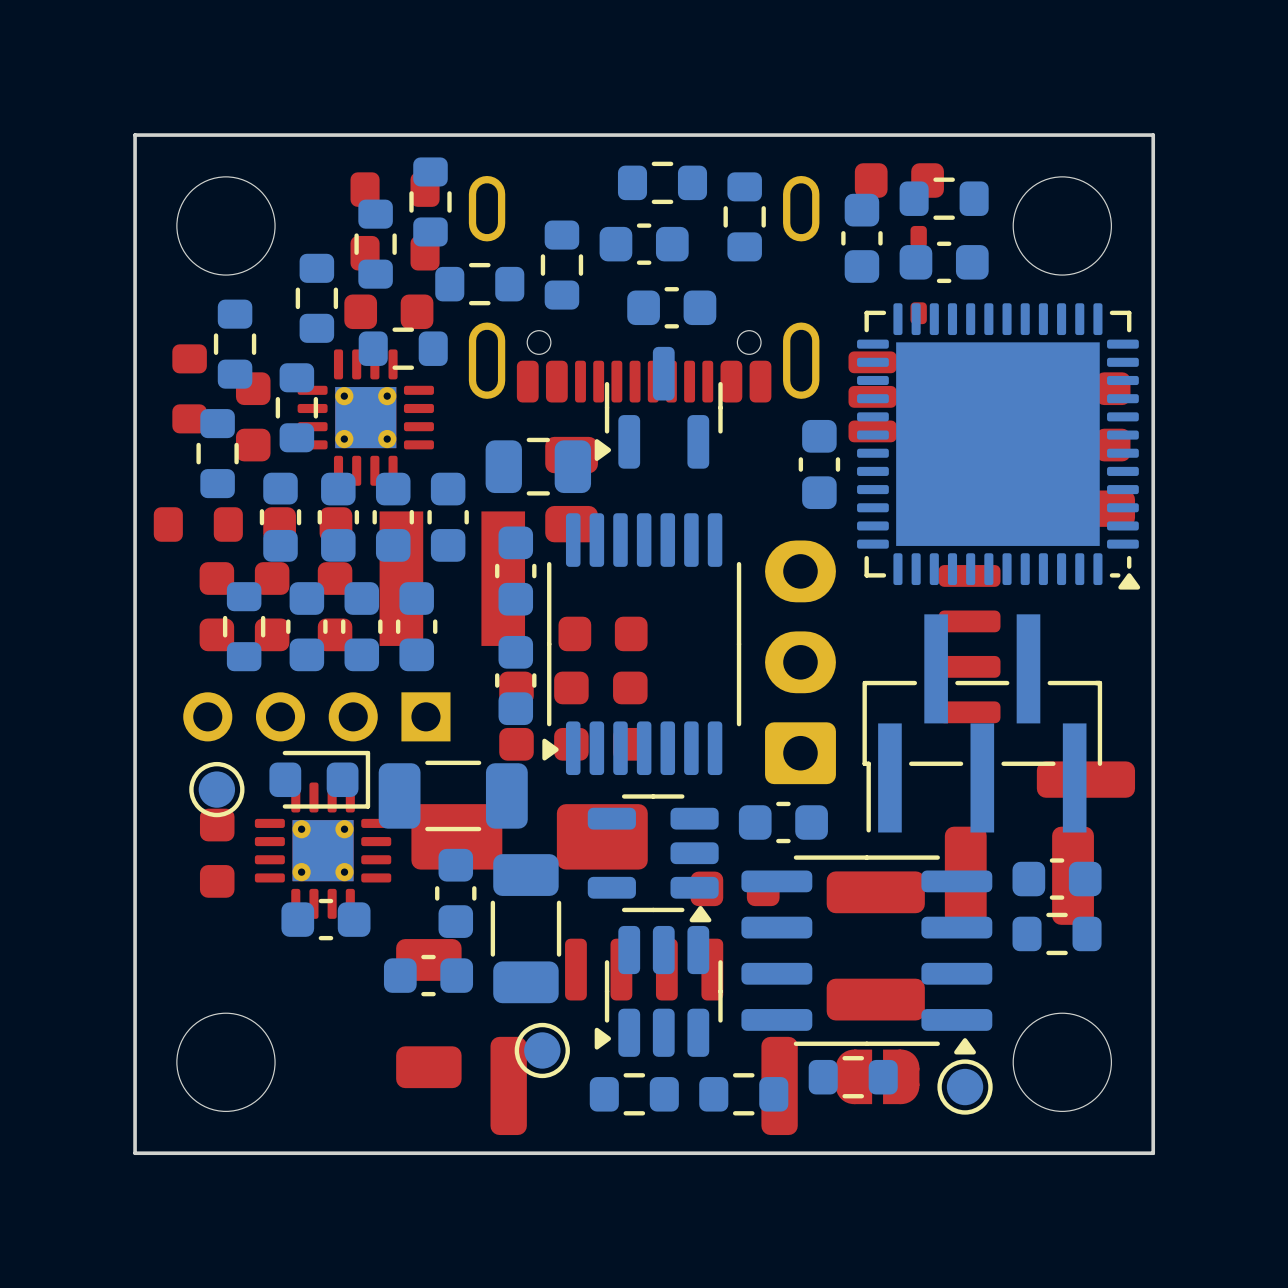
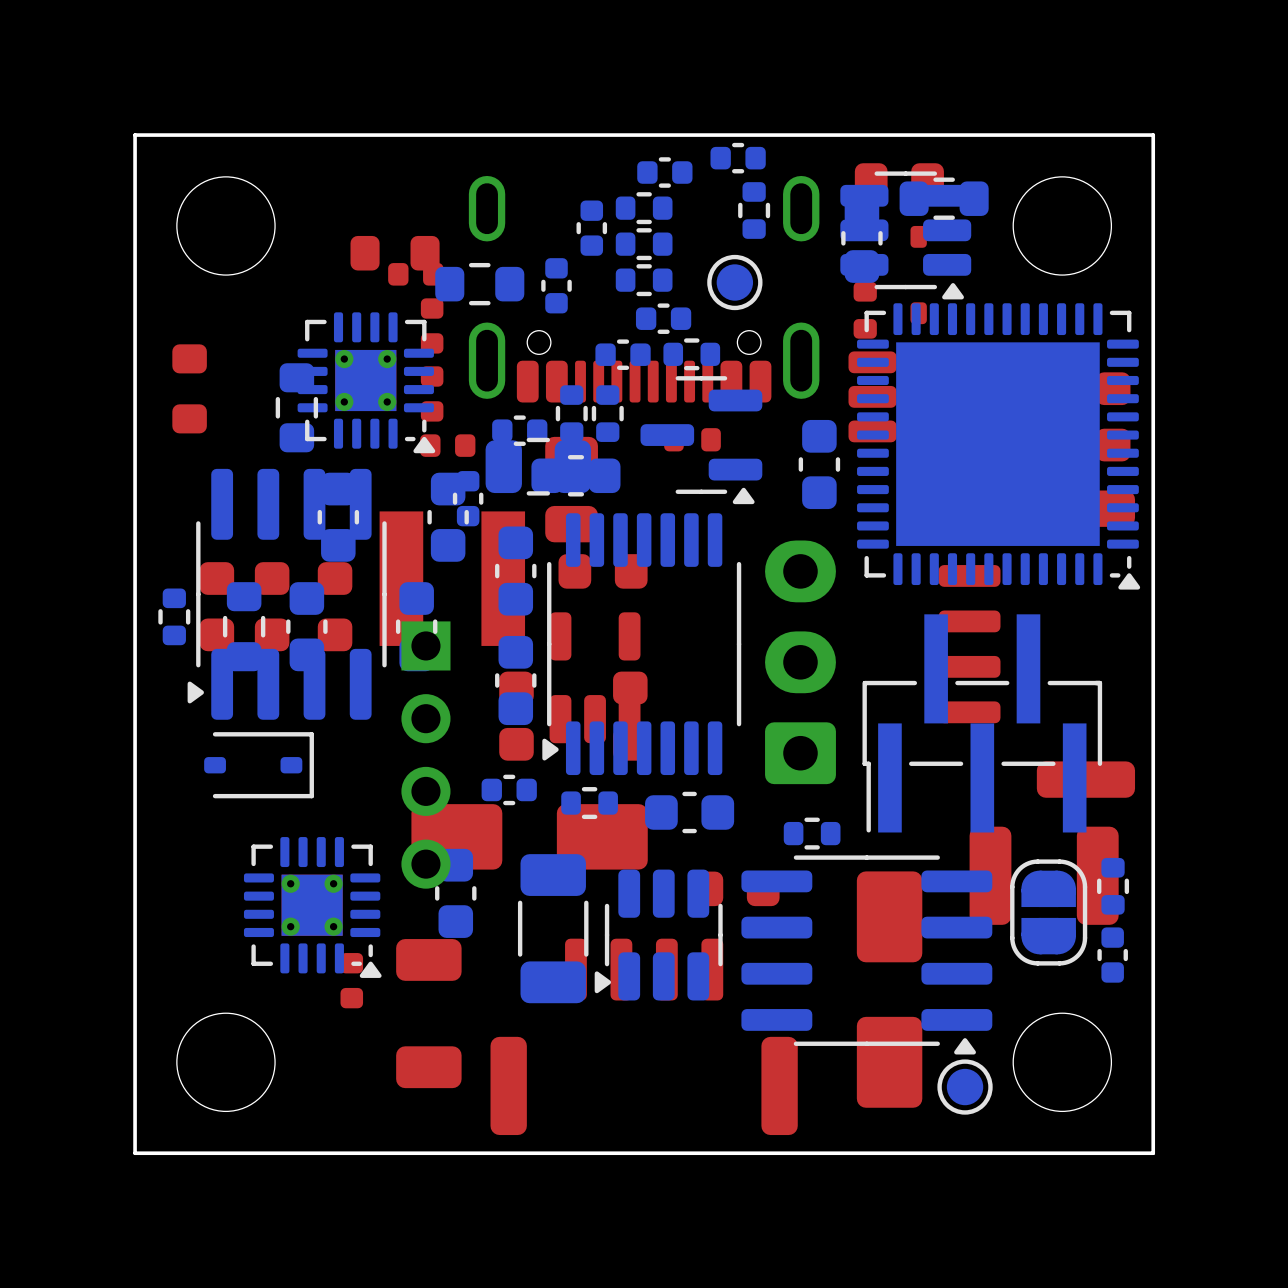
part: none -> (738, 158)
part footprint: [617, 161, 708, 205] -> [637, 157, 693, 188]
part footprint: [723, 172, 766, 262] -> [738, 182, 771, 239]
part: (395, 189) -> none
part: (430, 201) -> none
part: none -> (644, 208)
part footprint: [540, 220, 584, 310] -> [541, 258, 572, 314]
part footprint: [599, 223, 689, 265] -> [615, 228, 673, 261]
part: none -> (591, 228)
part: none -> (905, 235)
part: (375, 244) -> none
part: (944, 262) -> none
part: none -> (415, 274)
part: none -> (644, 280)
part: none -> (734, 282)
part footprint: [627, 287, 717, 329] -> [635, 303, 692, 334]
part: (316, 298) -> none
part: none -> (865, 310)
part: (388, 311) -> none
part: none -> (432, 325)
part: (235, 344) -> none
part: (403, 348) -> none
part: none -> (623, 354)
part: none -> (691, 354)
part: none -> (432, 393)
part rotation: 0° (658, 407) -> 90° counterclockwise (701, 440)
part: none -> (571, 413)
part: none -> (607, 413)
part: (253, 416) -> none
part side: top (365, 417) -> bottom (366, 382)
part: none -> (519, 430)
part: none -> (692, 439)
part: none -> (447, 445)
part: (217, 453) -> none
part: none -> (468, 498)
part rotation: 0° (280, 517) -> 90° clockwise (575, 475)
part position: (280, 517) -> (575, 475)
part: (393, 517) -> none
part: (198, 524) -> none
part: (307, 524) -> none
part: none -> (287, 594)
part: none -> (174, 616)
part: (361, 626) -> none
part position: (603, 633) -> (603, 571)
part rotation: 0° (316, 716) -> 90° counterclockwise (425, 755)
part: (571, 716) -> none
part: none -> (259, 765)
part: (319, 779) -> none
part: (216, 789) -> none
part: none -> (509, 789)
part: (453, 795) -> none
part footprint: [738, 801, 828, 844] -> [783, 817, 841, 850]
part: none -> (589, 803)
part: none -> (689, 812)
part: (323, 850) -> none
part: (217, 853) -> none
part side: bottom (653, 858) -> top (595, 677)
part position: (1019, 875) -> (1044, 875)
part: (1057, 879) -> none
part: none -> (1113, 886)
part footprint: [281, 898, 371, 941] -> [243, 837, 382, 978]
part position: (525, 928) -> (553, 928)
part: (1057, 933) -> none
part: (875, 945) -> none
part: none -> (1112, 955)
part: (428, 975) -> none
part: none -> (351, 980)
part: none -> (889, 989)
part position: (658, 991) -> (658, 935)
part: (542, 1050) -> none
part side: top (877, 1076) -> bottom (1048, 912)
part: (853, 1077) -> none
part: (634, 1094) -> none
part: (743, 1094) -> none

